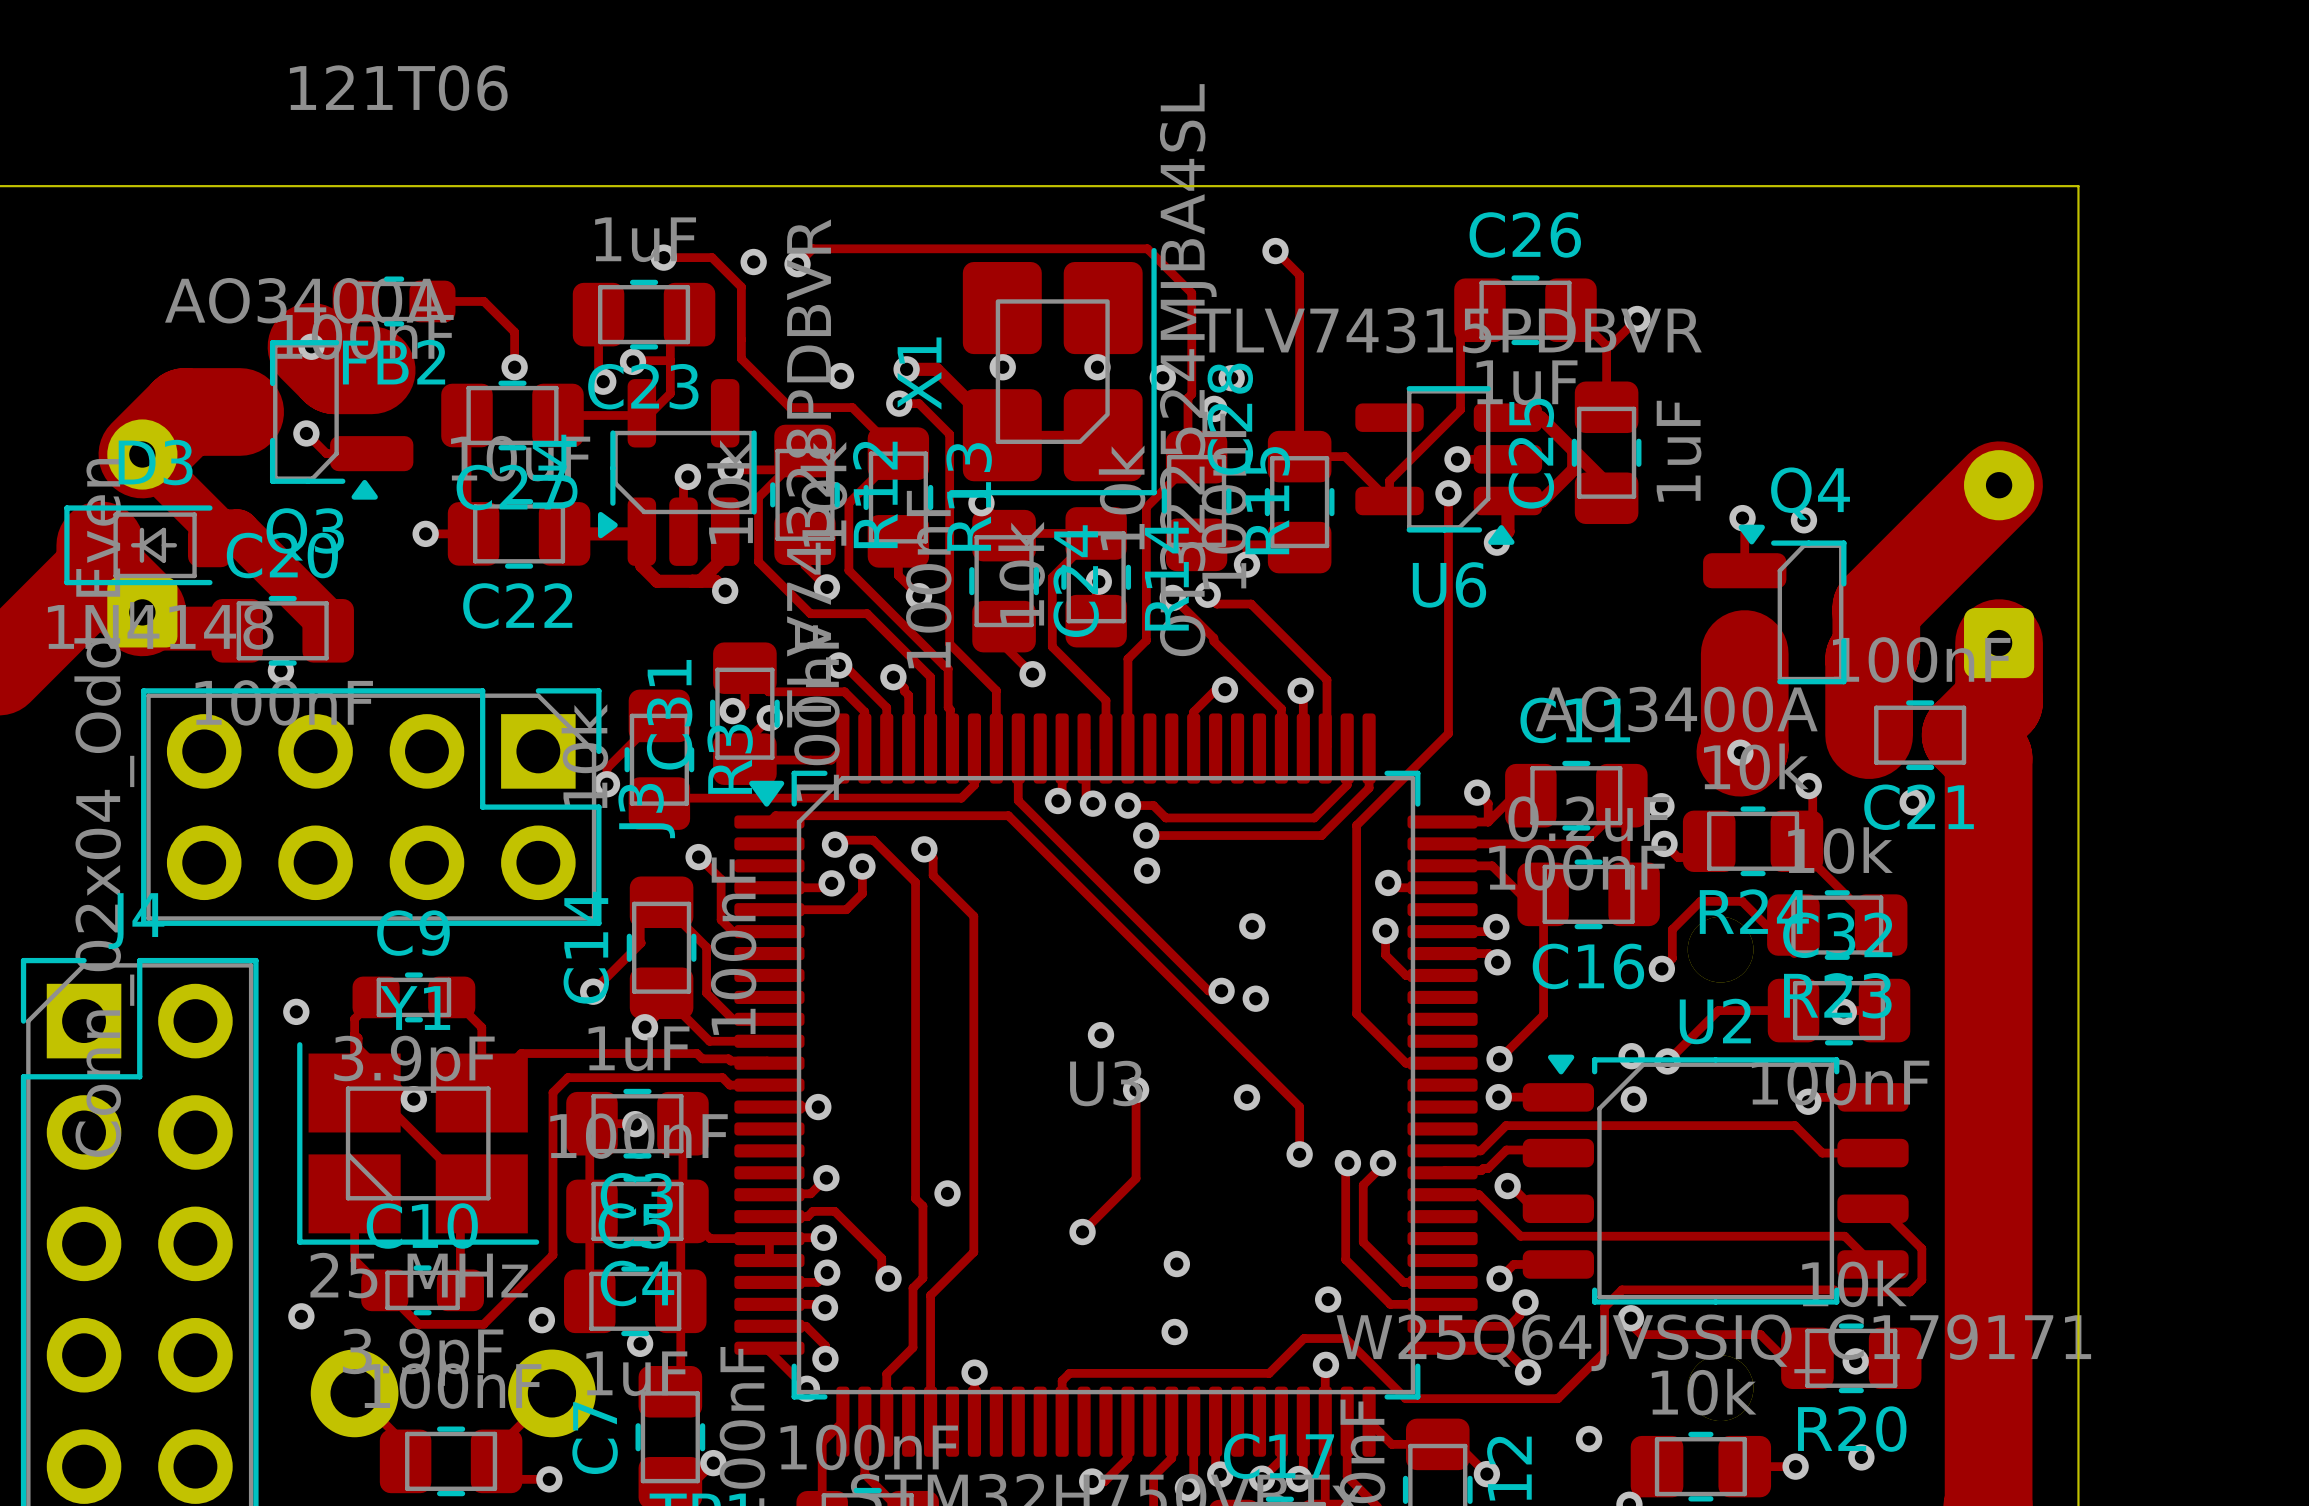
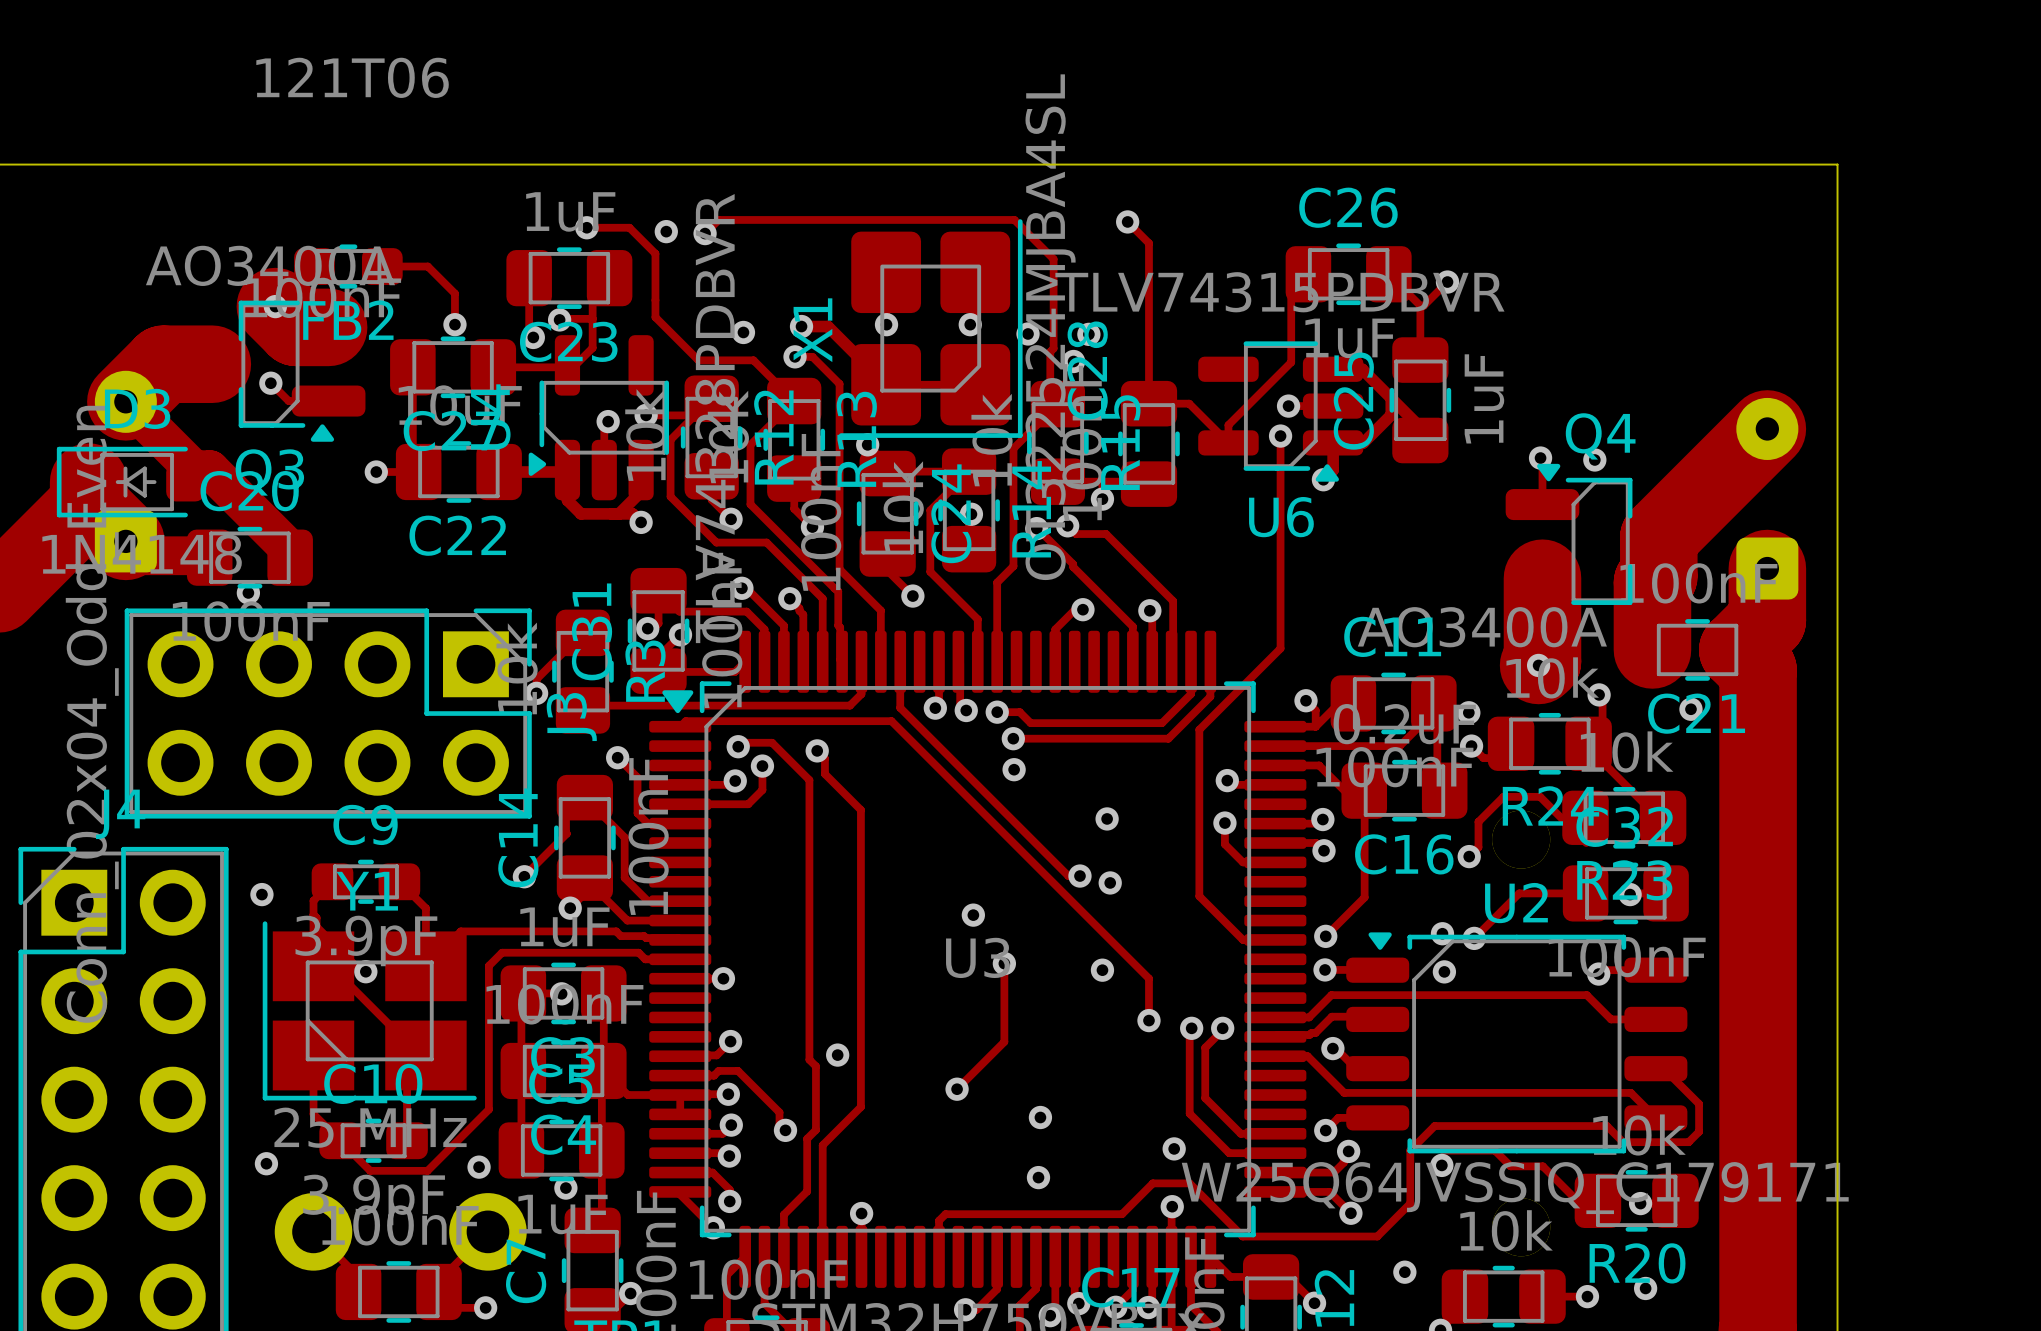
track: (1833, 1289) (1621, 1289) (1604, 1307) (1604, 1352) (1595, 1361) -> (1621, 1140) (1606, 1126) (1434, 1126) (1410, 1150) (1410, 1203)
track: (1630, 1318) (1634, 1322) (1634, 1328) (1641, 1334) (1760, 1334) -> (1443, 1150) (1494, 1150) (1510, 1166) (1542, 1166) (1556, 1179)

